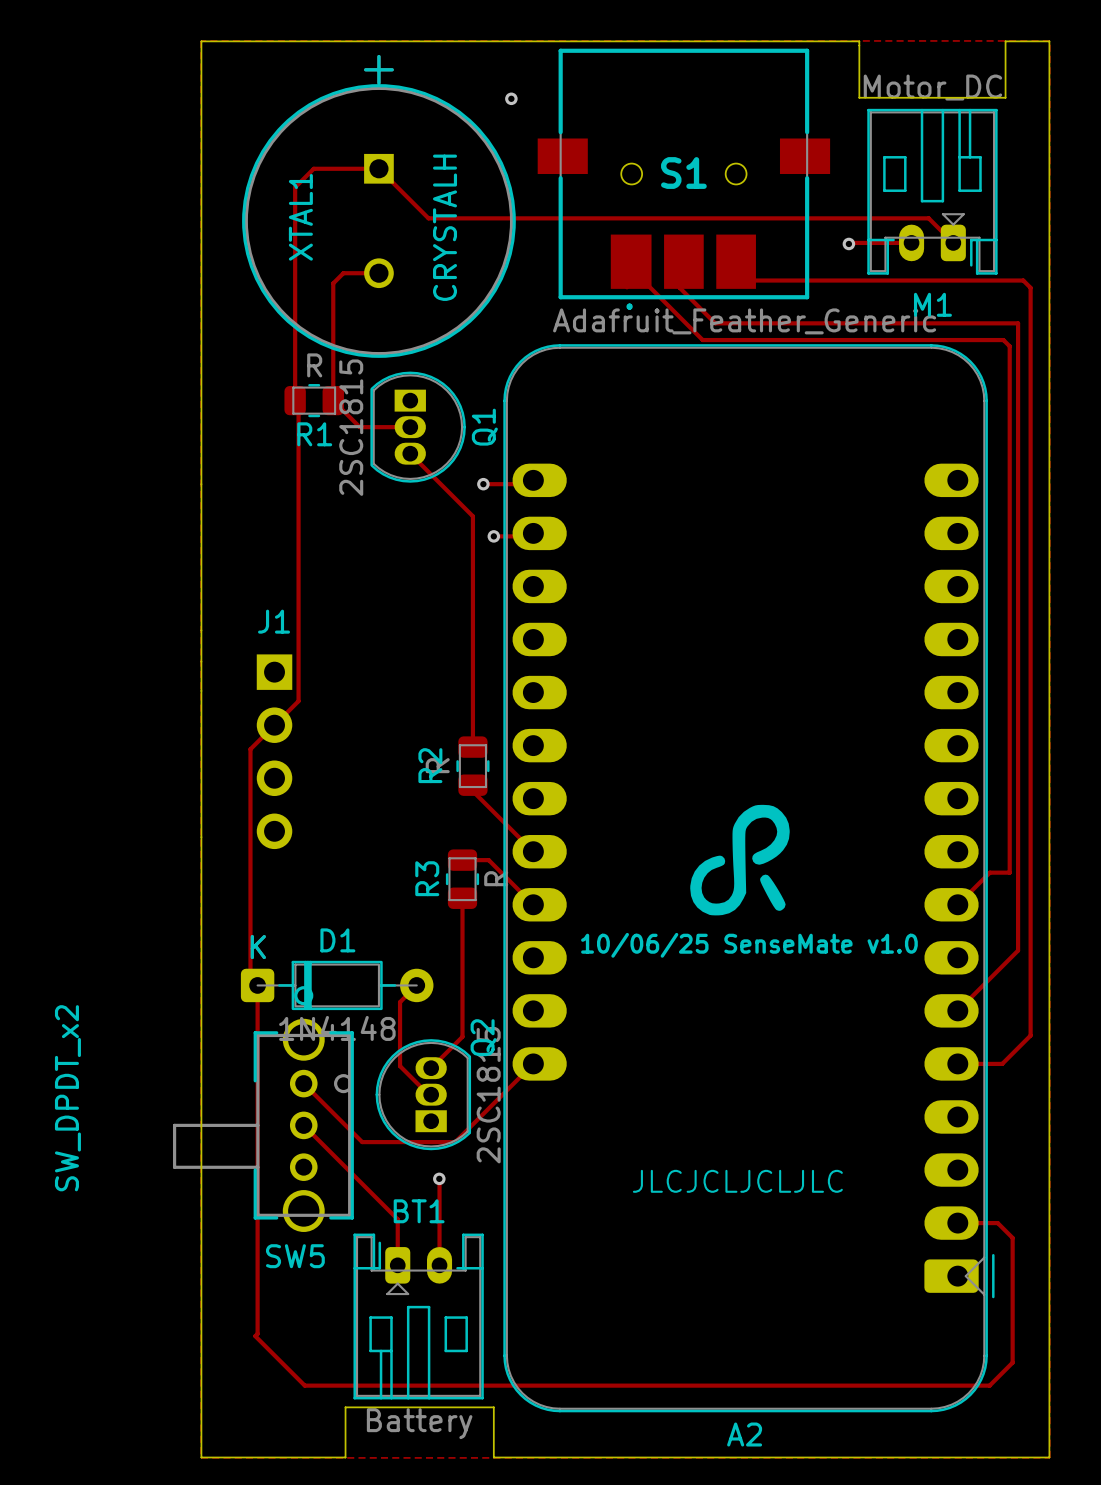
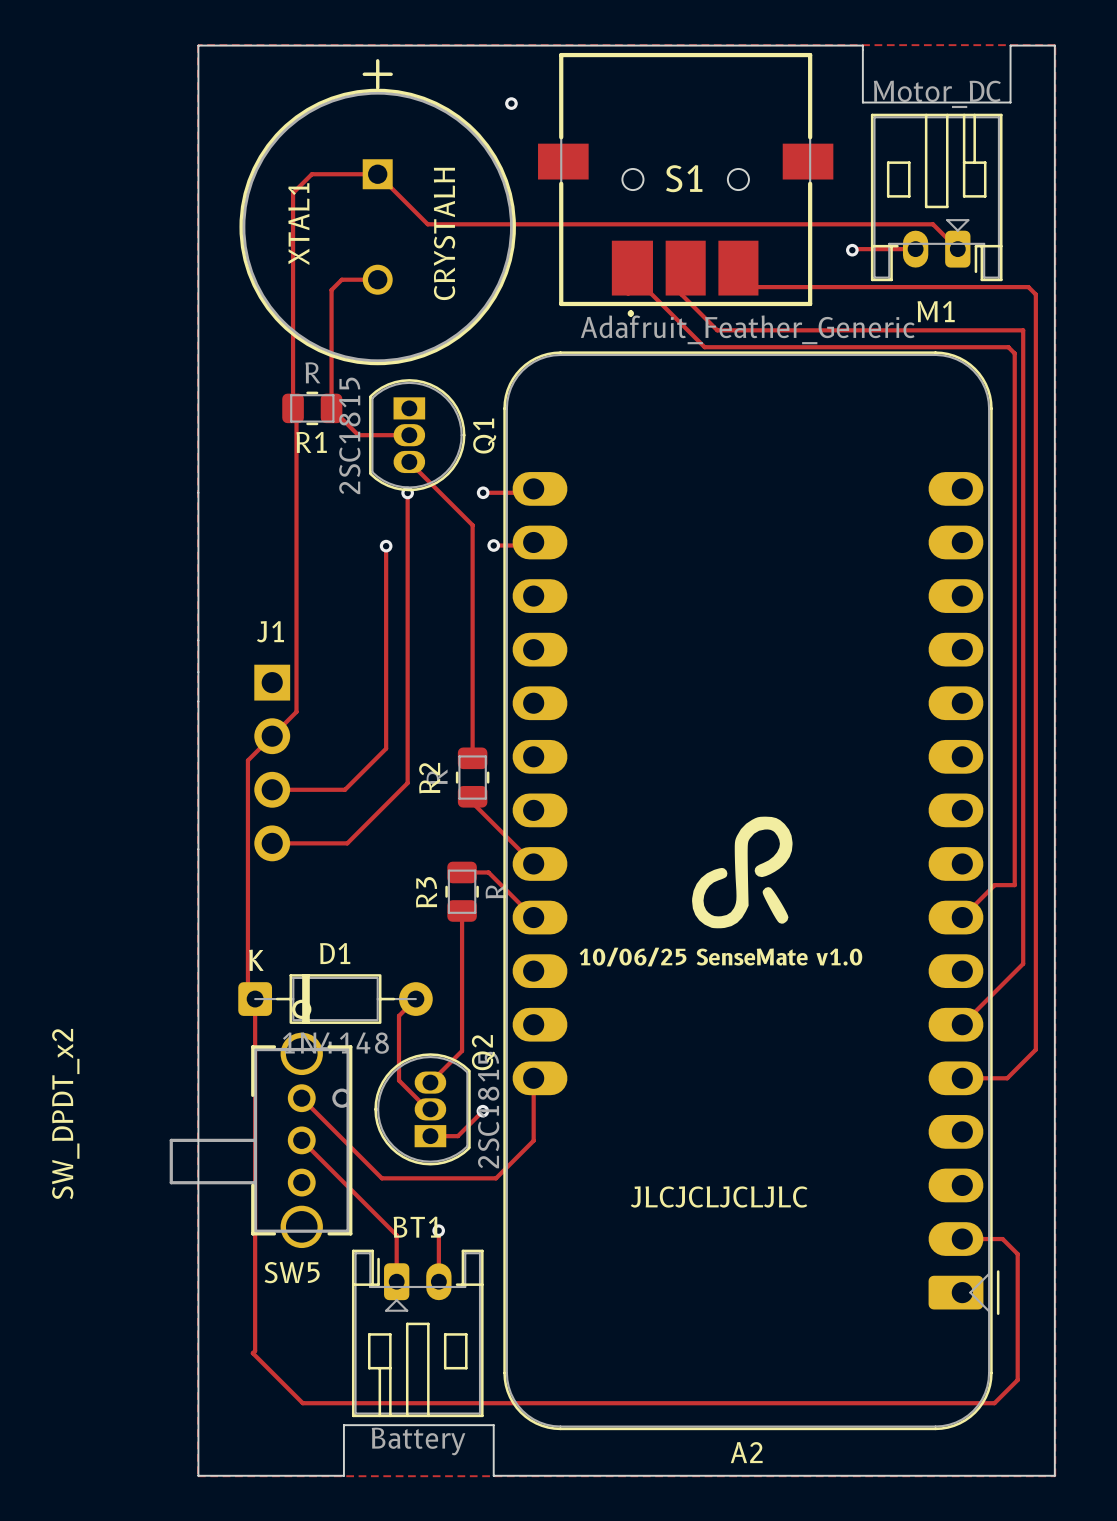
track: none -> (407, 492) (407, 783) (347, 843) (272, 843)
via: none -> (407, 492)
track: none -> (386, 546) (386, 748) (345, 789) (272, 789)
via: none -> (386, 546)
track: (533, 1063) (455, 1142) (362, 1142) -> (533, 1078) (533, 1140) (496, 1178) (381, 1178) (360, 1157)
track: none -> (482, 1111) (457, 1136) (430, 1136)
via: none -> (482, 1111)
via position: (439, 1178) -> (438, 1230)
track: (439, 1179) (439, 1214) -> none

